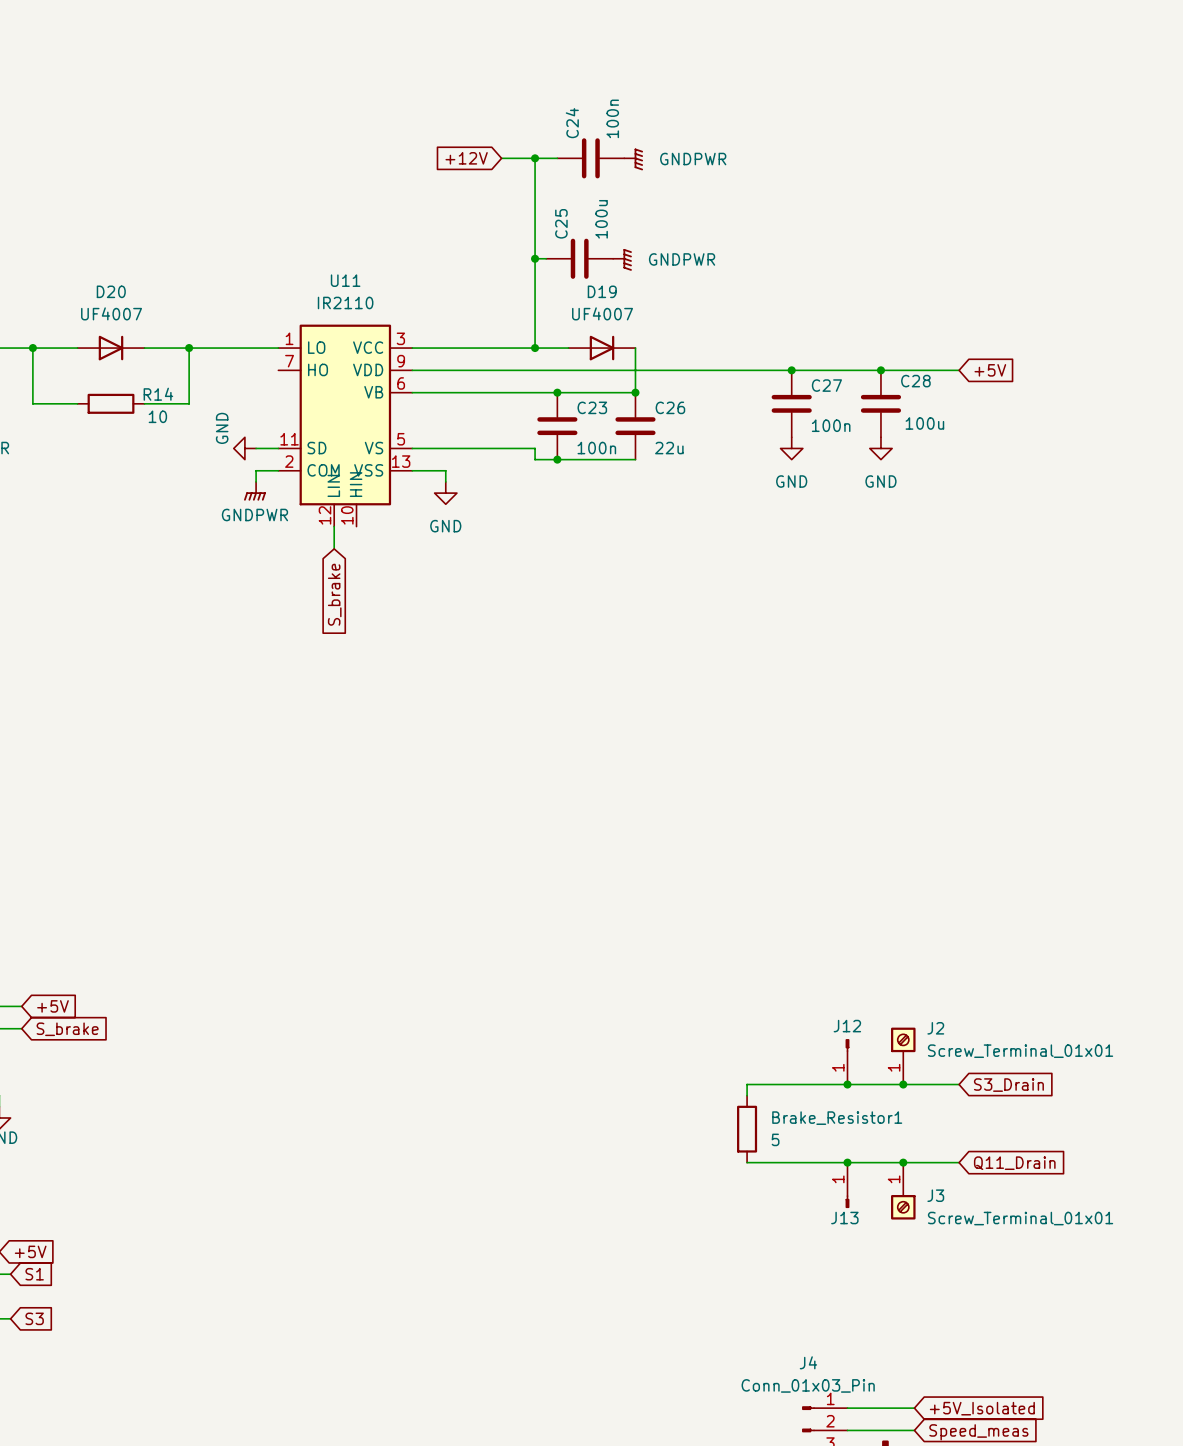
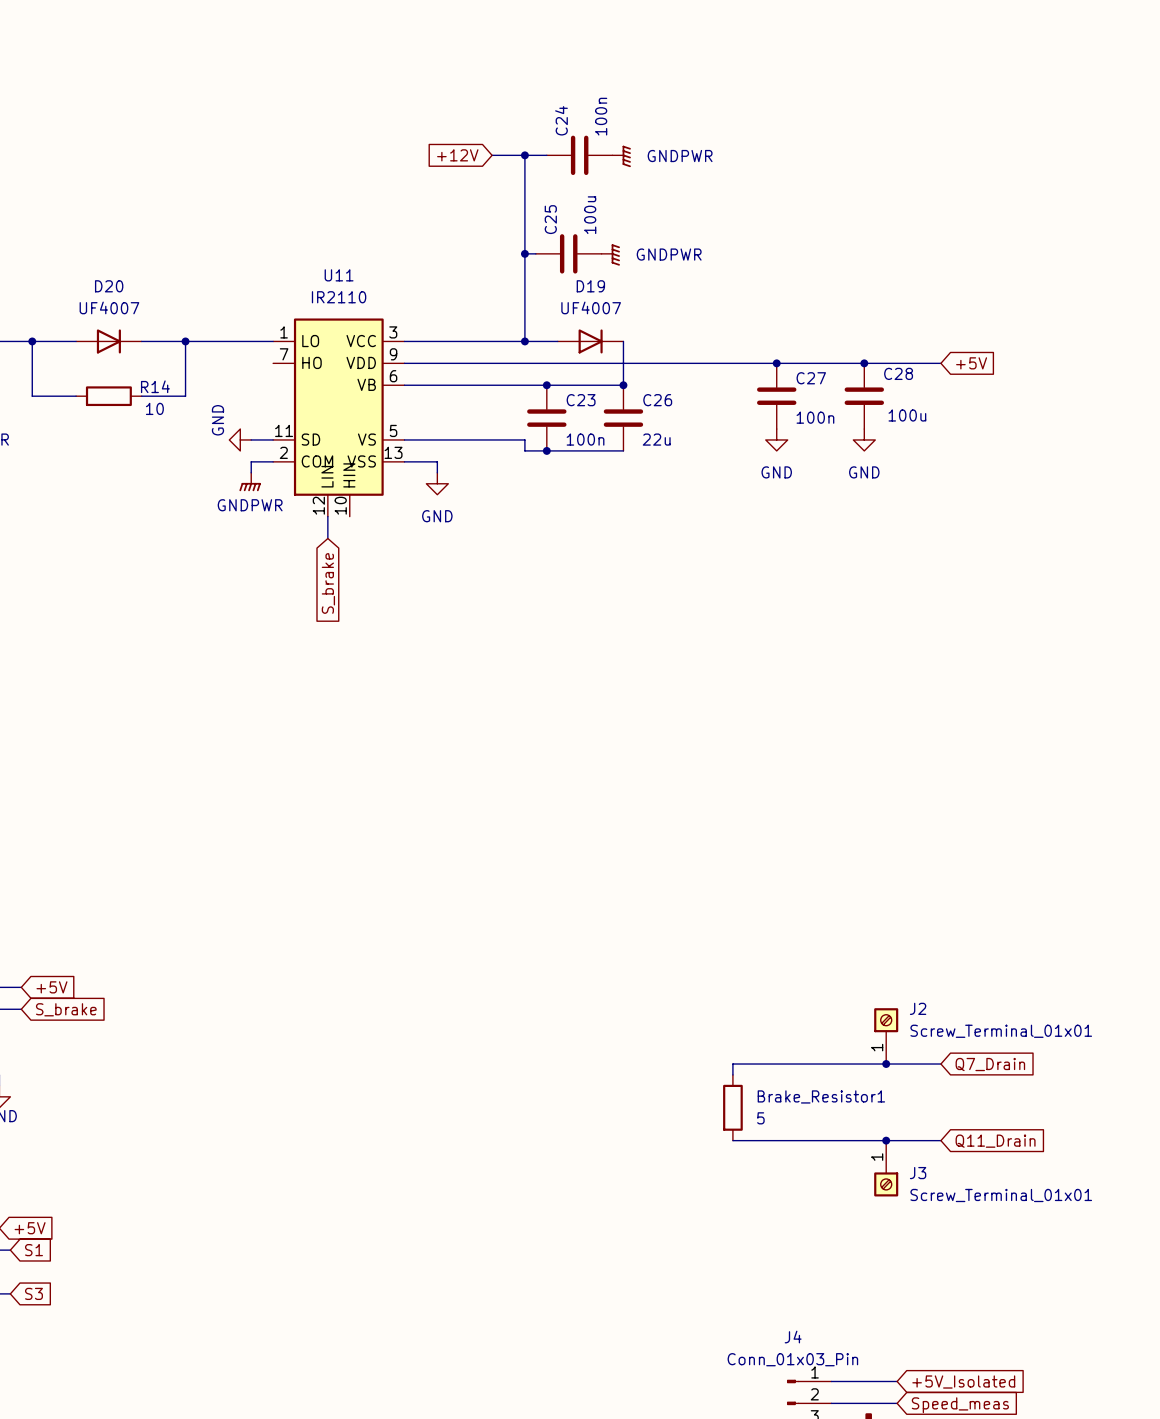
J12: (847, 1061) -> none
junction: (847, 1084) -> none
global label: S3_Drain (1008, 1085) -> Q7_Drain (990, 1064)
junction: (847, 1162) -> none
J13: (847, 1185) -> none

